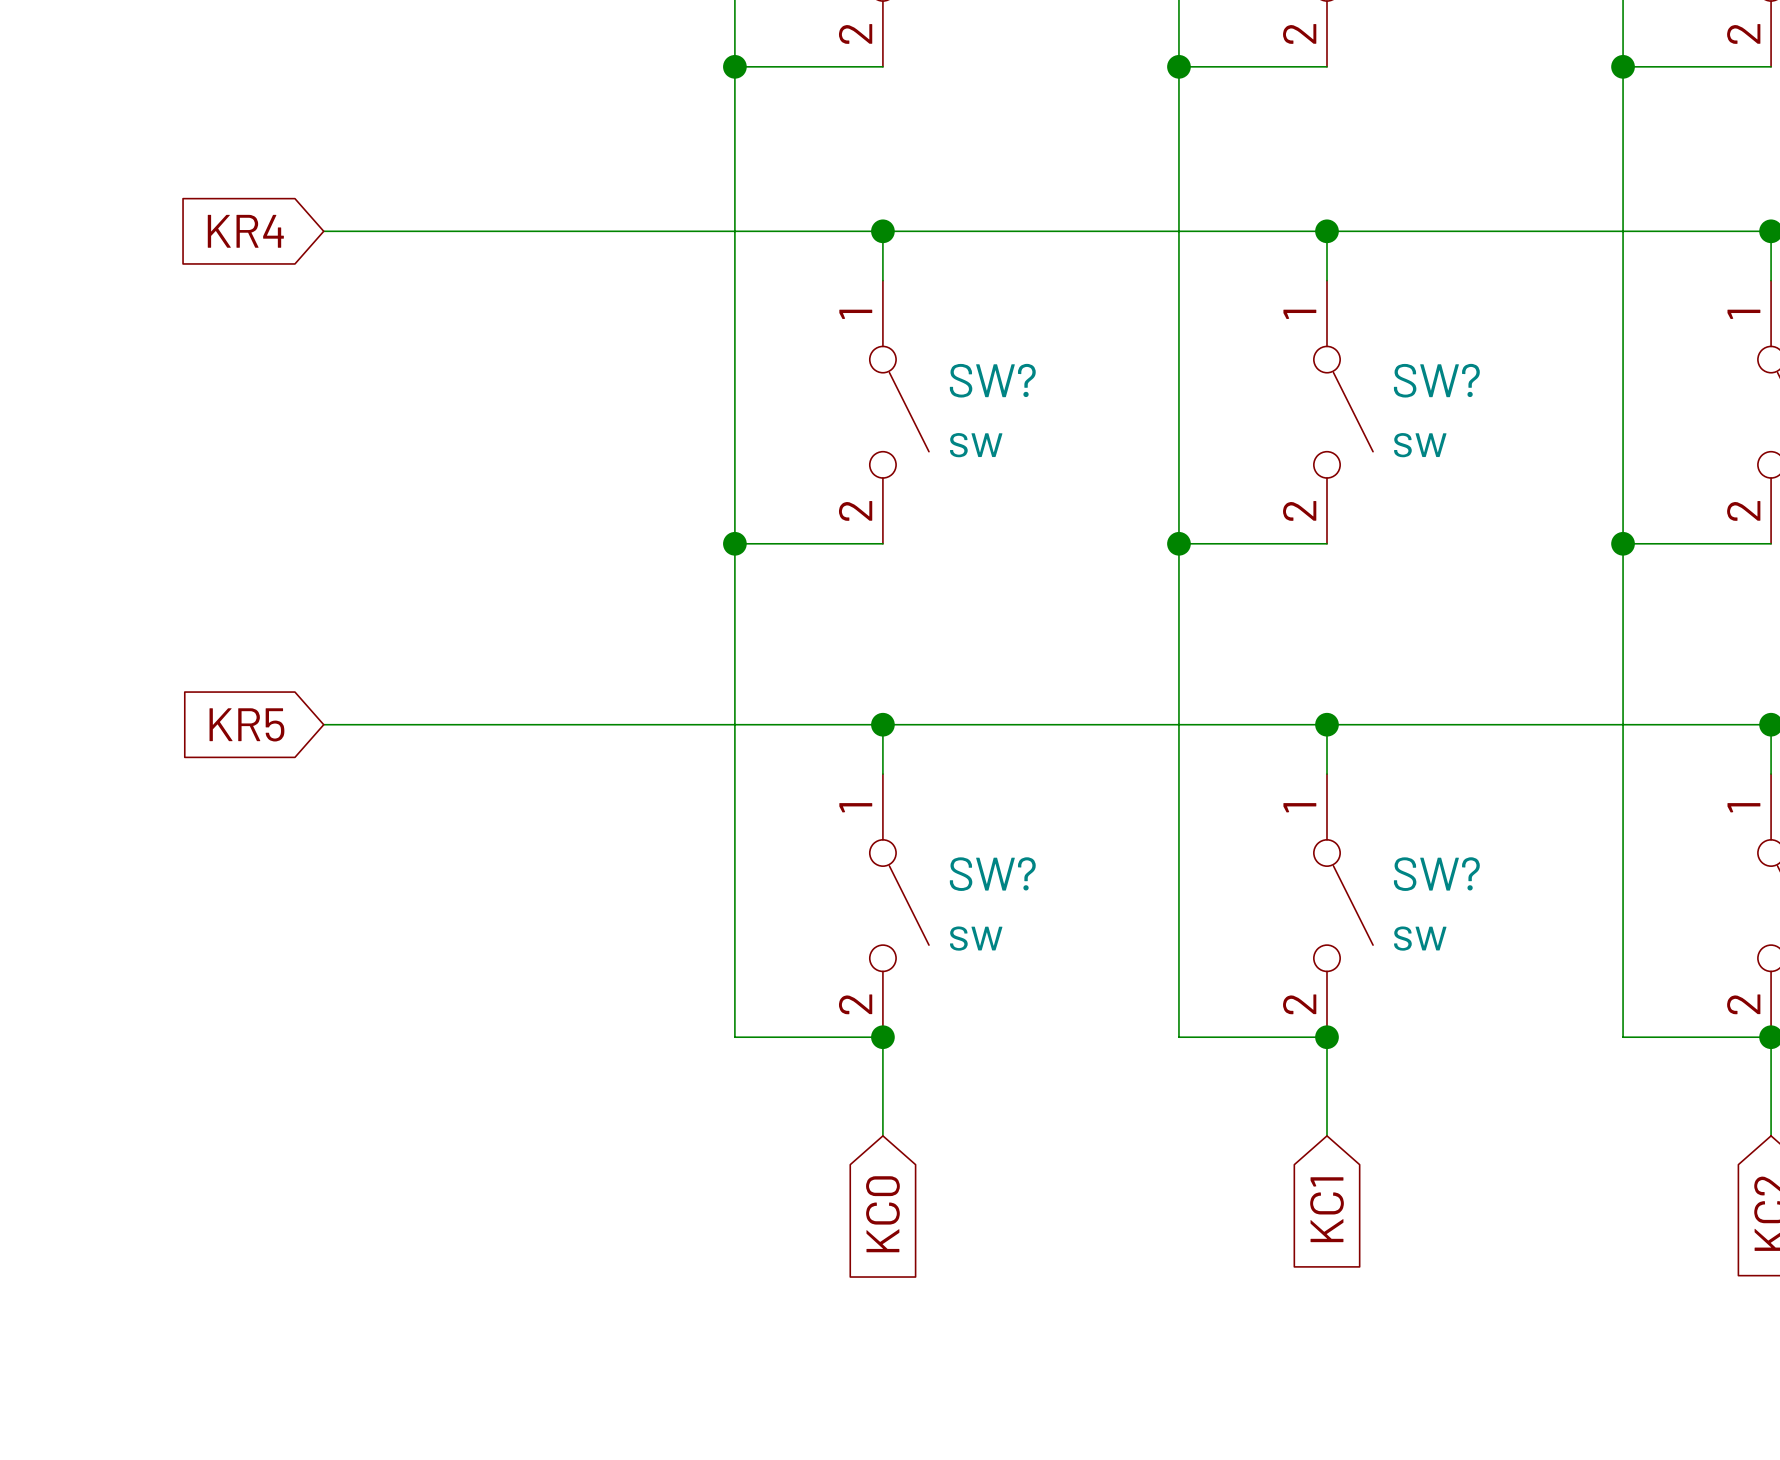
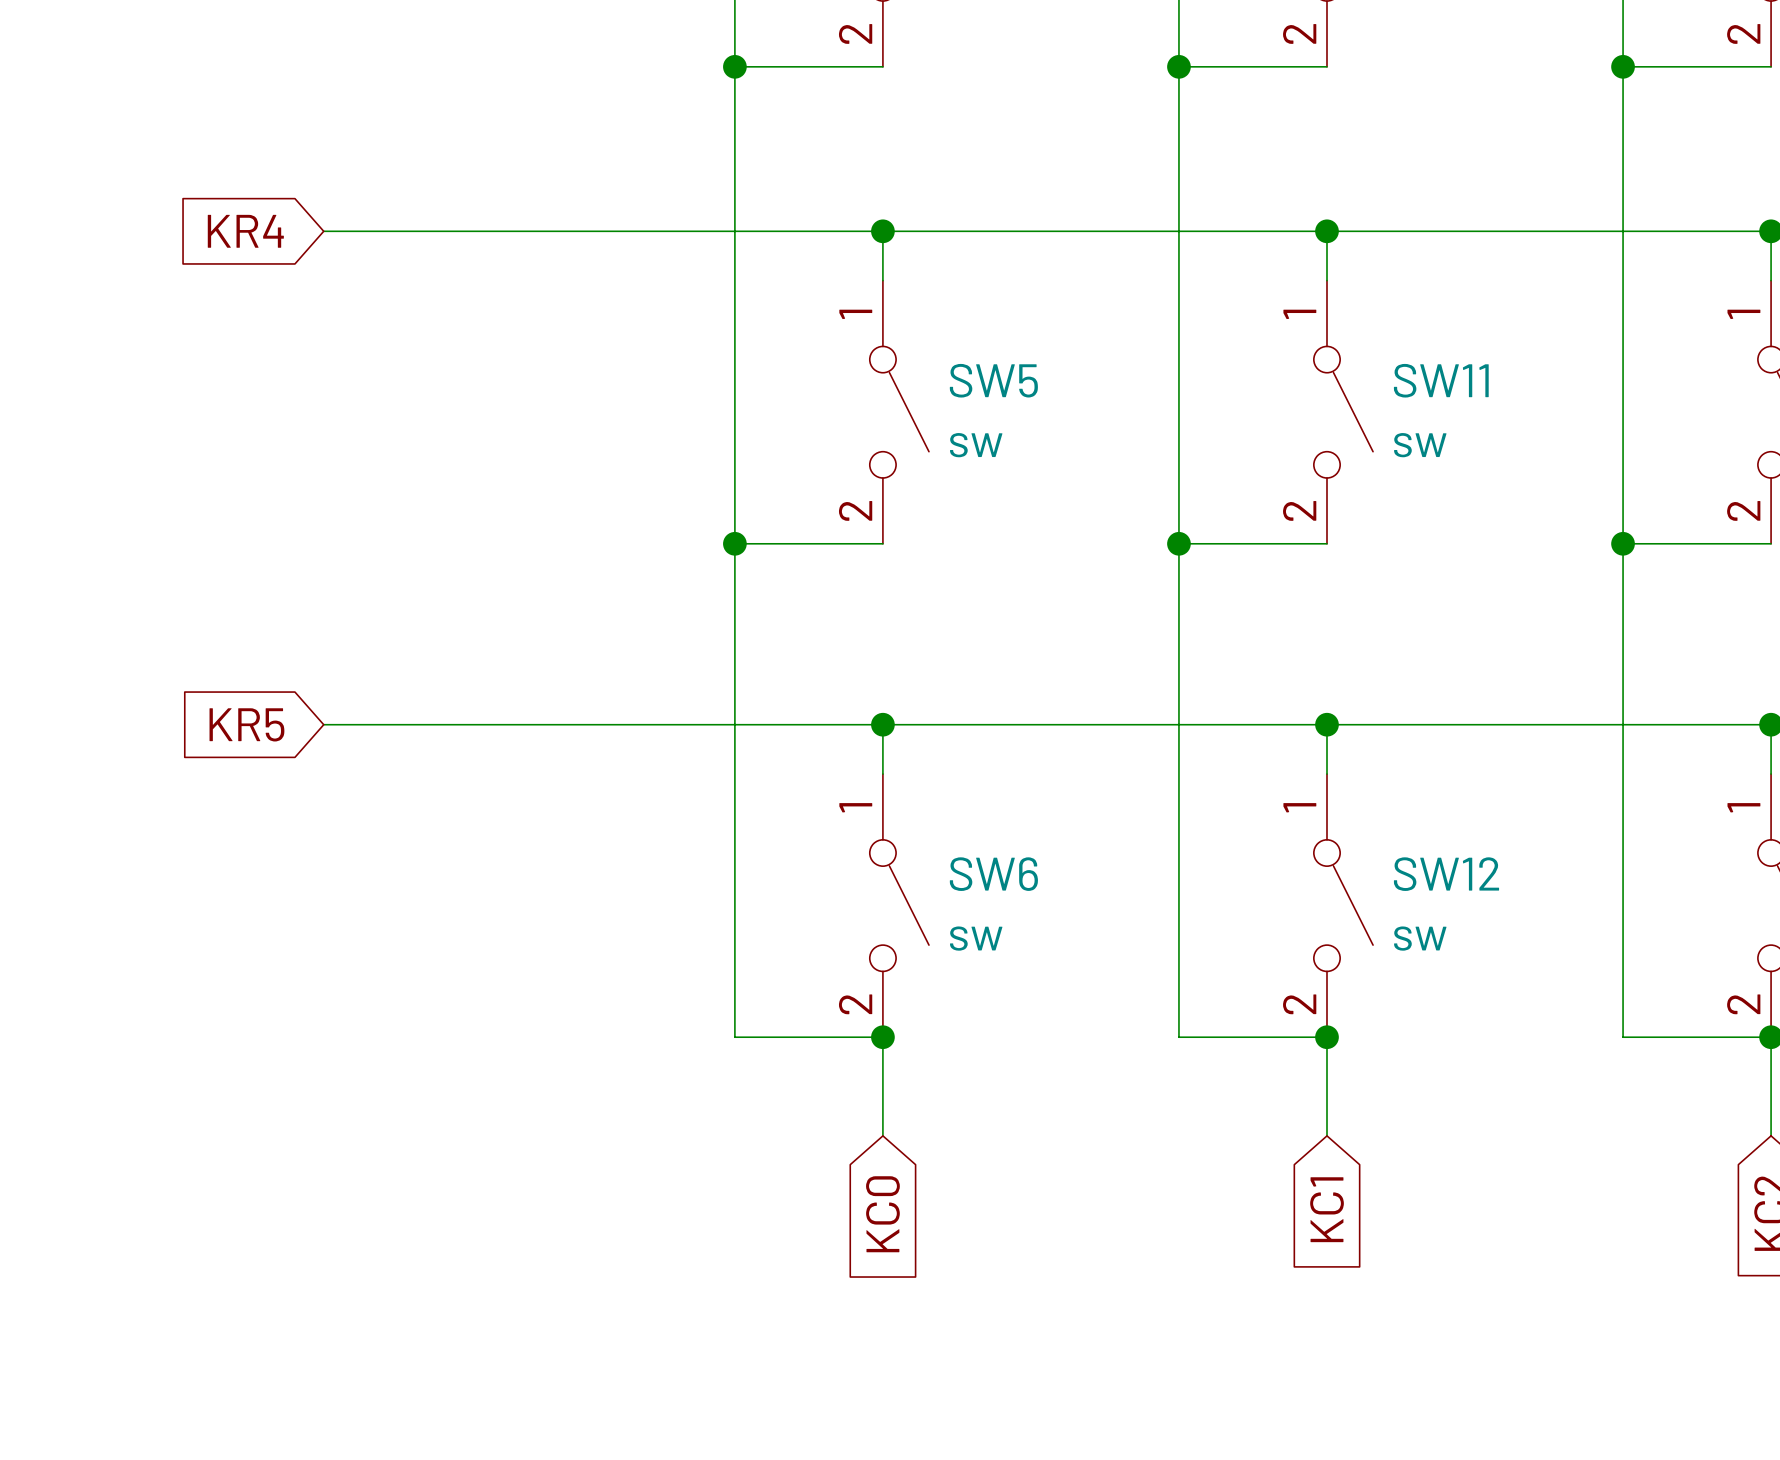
SW? name: SW? (992, 380) -> SW5 (993, 380)
SW? name: SW? (1436, 380) -> SW11 (1441, 380)
SW? name: SW? (992, 874) -> SW6 (993, 874)
SW? name: SW? (1436, 874) -> SW12 (1446, 874)

